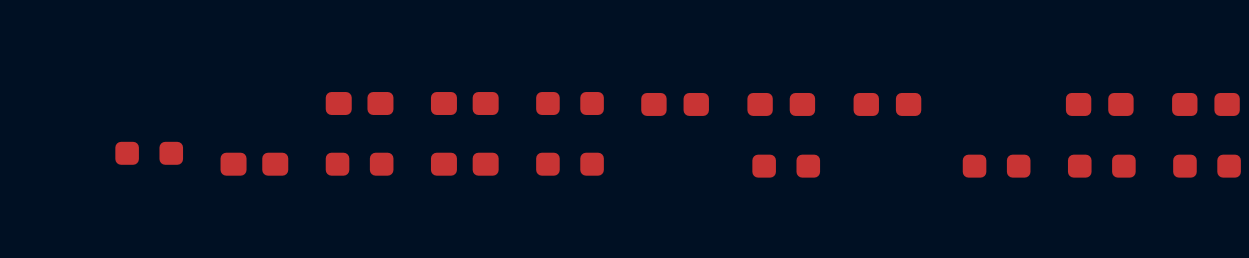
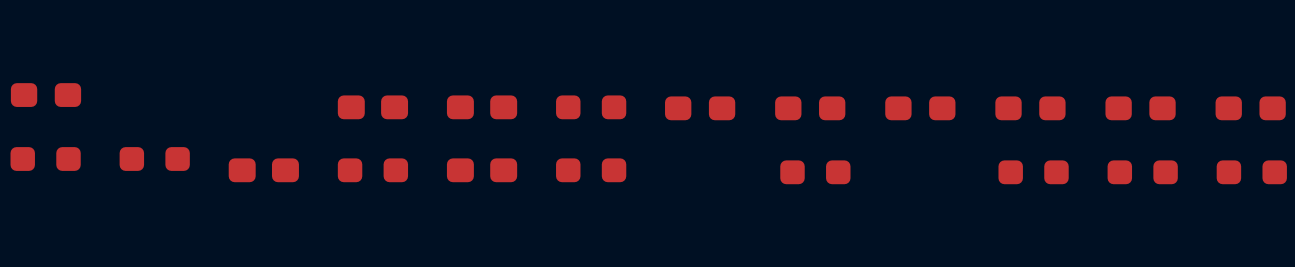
part: none -> (46, 95)
part: none -> (1030, 108)
part: none -> (45, 159)

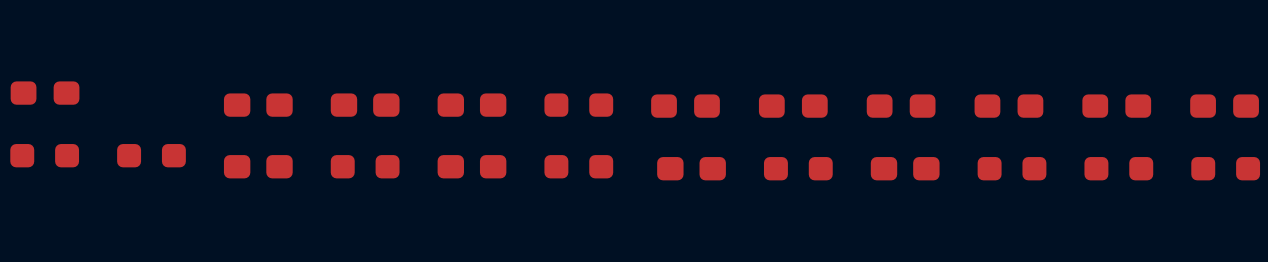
part: none -> (258, 105)
part: none -> (691, 168)
part: none -> (905, 168)

